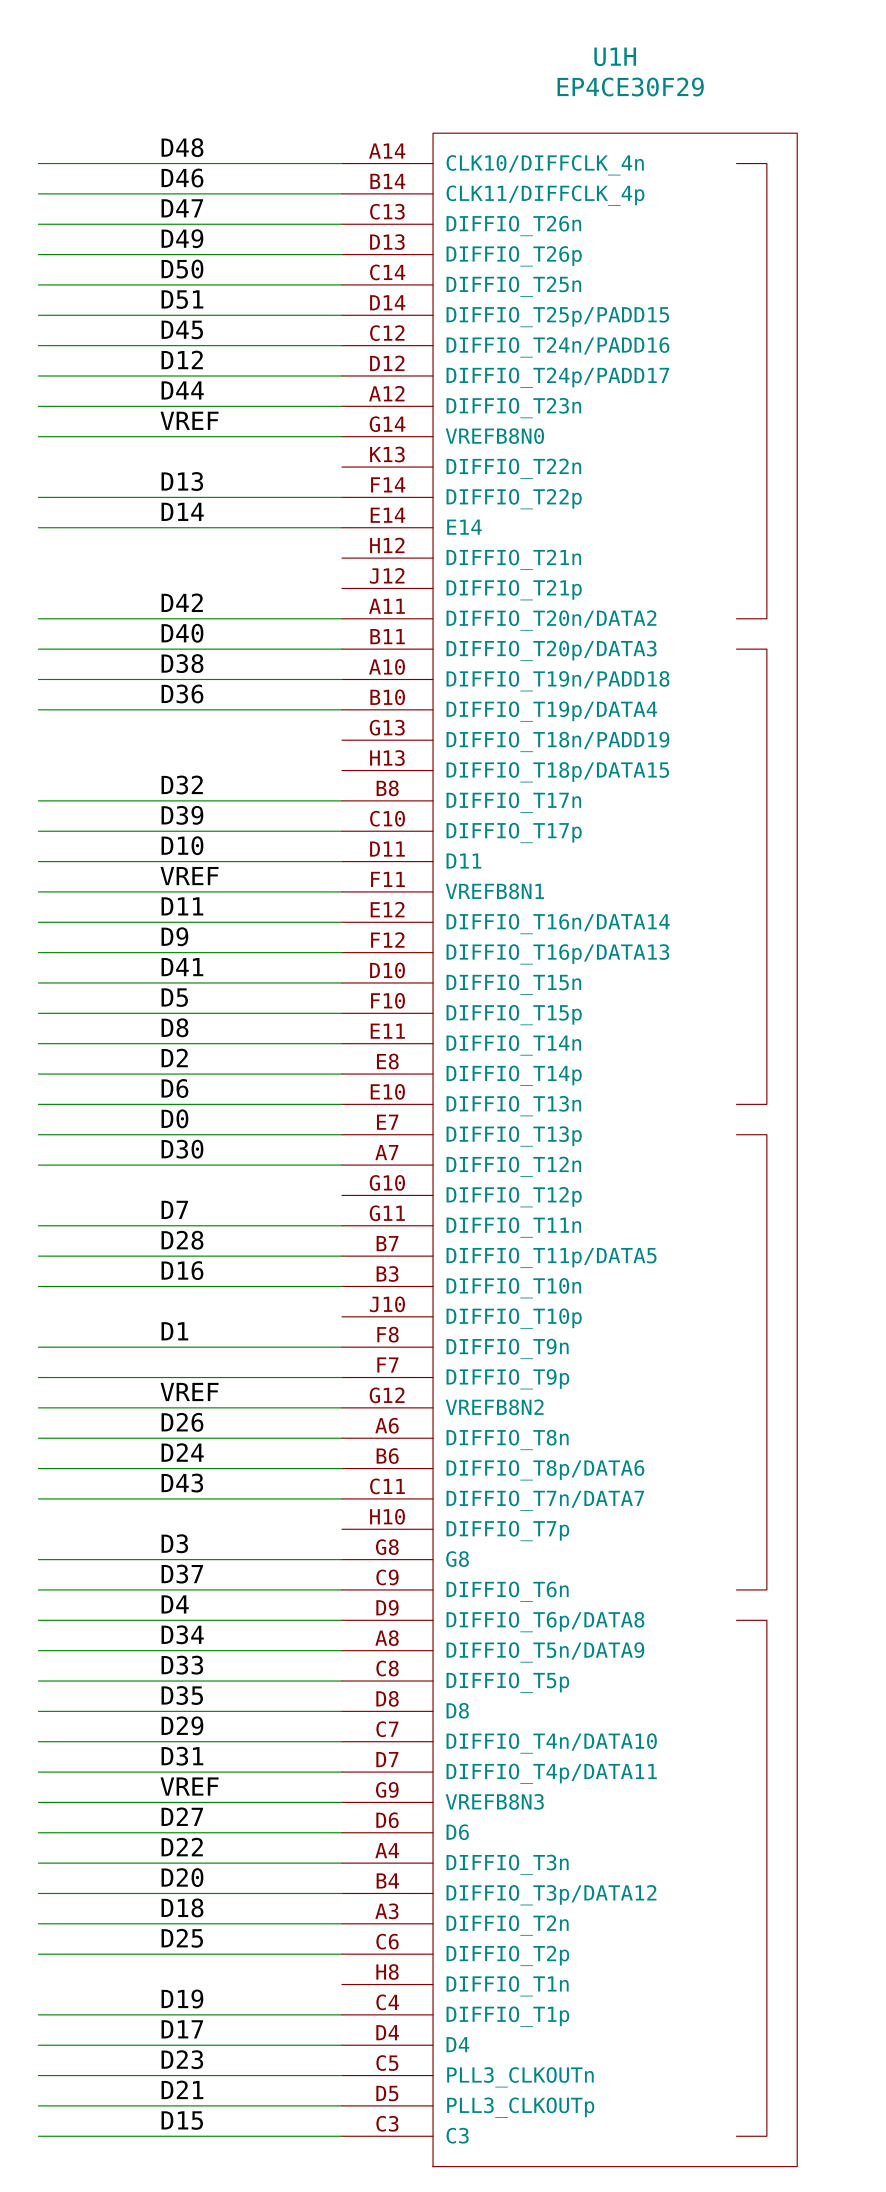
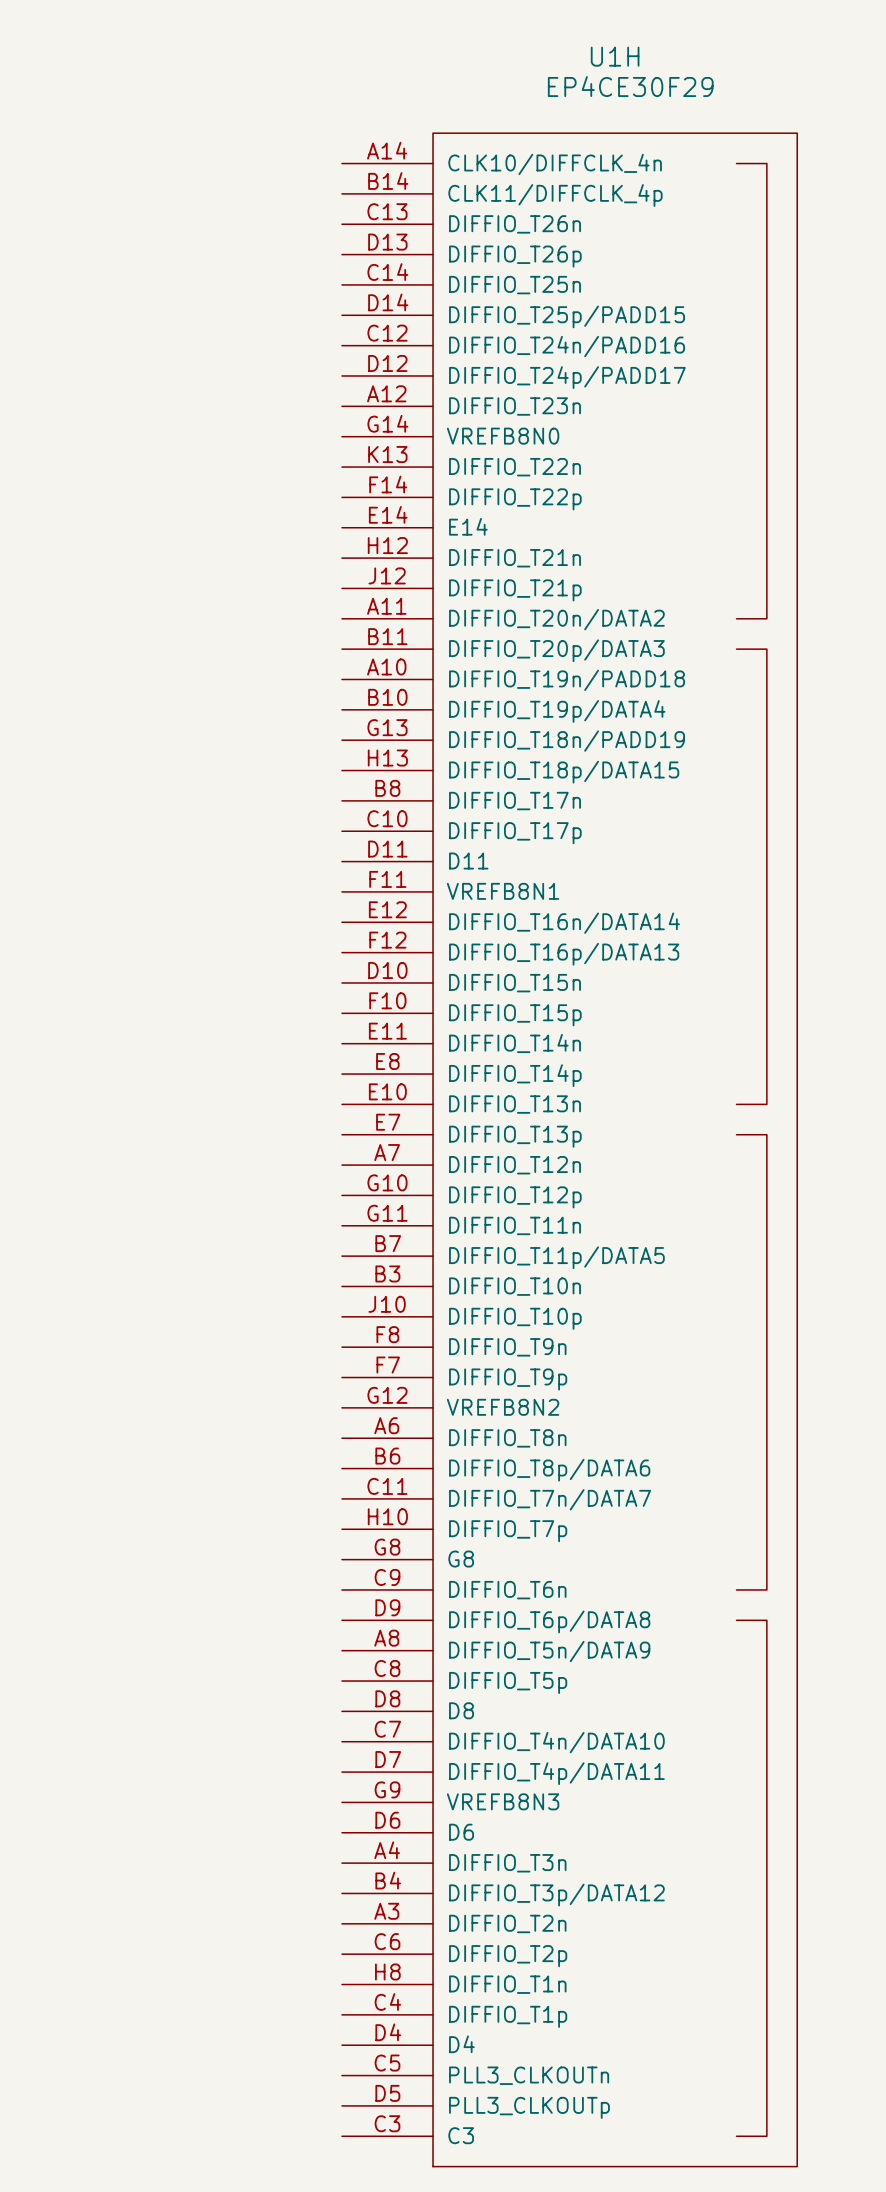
label: D48 (182, 147) -> none
wire: (38, 163) (341, 163) -> none
label: D46 (182, 178) -> none
wire: (38, 193) (341, 193) -> none
label: D47 (182, 208) -> none
wire: (38, 224) (341, 224) -> none
label: D49 (182, 238) -> none
wire: (38, 254) (341, 254) -> none
label: D50 (182, 269) -> none
wire: (38, 284) (341, 284) -> none
label: D51 (182, 299) -> none
wire: (38, 315) (341, 315) -> none
label: D45 (182, 329) -> none
wire: (38, 345) (341, 345) -> none
label: D12 (182, 359) -> none
wire: (38, 375) (341, 375) -> none
label: D44 (182, 390) -> none
wire: (38, 406) (341, 406) -> none
label: VREF (189, 420) -> none
wire: (38, 436) (341, 436) -> none
label: D13 (182, 481) -> none
wire: (38, 497) (341, 497) -> none
label: D14 (182, 511) -> none
wire: (38, 527) (341, 527) -> none
label: D42 (182, 602) -> none
wire: (38, 618) (341, 618) -> none
label: D40 (182, 633) -> none
wire: (38, 649) (341, 649) -> none
label: D38 (182, 663) -> none
wire: (38, 679) (341, 679) -> none
label: D36 (182, 693) -> none
wire: (38, 709) (341, 709) -> none
label: D32 (182, 785) -> none
wire: (38, 800) (341, 800) -> none
label: D39 (182, 815) -> none
wire: (38, 831) (341, 831) -> none
label: D10 (182, 845) -> none
wire: (38, 861) (341, 861) -> none
label: VREF (189, 876) -> none
wire: (38, 891) (341, 891) -> none
label: D11 (182, 906) -> none
wire: (38, 922) (341, 922) -> none
label: D9 (174, 936) -> none
wire: (38, 952) (341, 952) -> none
label: D41 (182, 967) -> none
wire: (38, 982) (341, 982) -> none
label: D5 (174, 997) -> none
wire: (38, 1013) (341, 1013) -> none
label: D8 (174, 1027) -> none
wire: (38, 1043) (341, 1043) -> none
label: D2 (174, 1057) -> none
wire: (38, 1074) (341, 1074) -> none
label: D6 (174, 1088) -> none
wire: (38, 1104) (341, 1104) -> none
label: D0 (174, 1118) -> none
wire: (38, 1134) (341, 1134) -> none
label: D30 (182, 1149) -> none
wire: (38, 1165) (341, 1165) -> none
label: D7 (174, 1209) -> none
wire: (38, 1225) (341, 1225) -> none
label: D28 (182, 1240) -> none
wire: (38, 1256) (341, 1256) -> none
label: D16 (182, 1270) -> none
wire: (38, 1286) (341, 1286) -> none
label: D1 (174, 1331) -> none
wire: (38, 1347) (341, 1347) -> none
wire: (38, 1377) (341, 1377) -> none
label: VREF (189, 1391) -> none
wire: (38, 1407) (341, 1407) -> none
label: D26 (182, 1422) -> none
wire: (38, 1438) (341, 1438) -> none
label: D24 (182, 1452) -> none
wire: (38, 1468) (341, 1468) -> none
label: D43 (182, 1483) -> none
wire: (38, 1498) (341, 1498) -> none
label: D3 (174, 1543) -> none
wire: (38, 1559) (341, 1559) -> none
label: D37 (182, 1574) -> none
wire: (38, 1589) (341, 1589) -> none
label: D4 (175, 1604) -> none
wire: (38, 1620) (341, 1620) -> none
label: D34 (182, 1634) -> none
wire: (38, 1650) (341, 1650) -> none
label: D33 (182, 1665) -> none
wire: (38, 1681) (341, 1681) -> none
label: D35 (182, 1695) -> none
wire: (38, 1711) (341, 1711) -> none
label: D29 (182, 1725) -> none
wire: (38, 1741) (341, 1741) -> none
label: D31 (182, 1756) -> none
wire: (38, 1772) (341, 1772) -> none
label: VREF (189, 1786) -> none
wire: (38, 1802) (341, 1802) -> none
label: D27 (182, 1816) -> none
wire: (38, 1832) (341, 1832) -> none
label: D22 (182, 1847) -> none
wire: (38, 1863) (341, 1863) -> none
label: D20 (182, 1877) -> none
wire: (38, 1893) (341, 1893) -> none
label: D18 (182, 1907) -> none
wire: (38, 1923) (341, 1923) -> none
label: D25 (182, 1938) -> none
wire: (38, 1954) (341, 1954) -> none
label: D19 (182, 1998) -> none
wire: (38, 2014) (341, 2014) -> none
label: D17 (182, 2029) -> none
wire: (38, 2045) (341, 2045) -> none
label: D23 (182, 2059) -> none
wire: (38, 2075) (341, 2075) -> none
label: D21 (182, 2089) -> none
wire: (38, 2105) (341, 2105) -> none
label: D15 (182, 2120) -> none
wire: (38, 2136) (341, 2136) -> none

